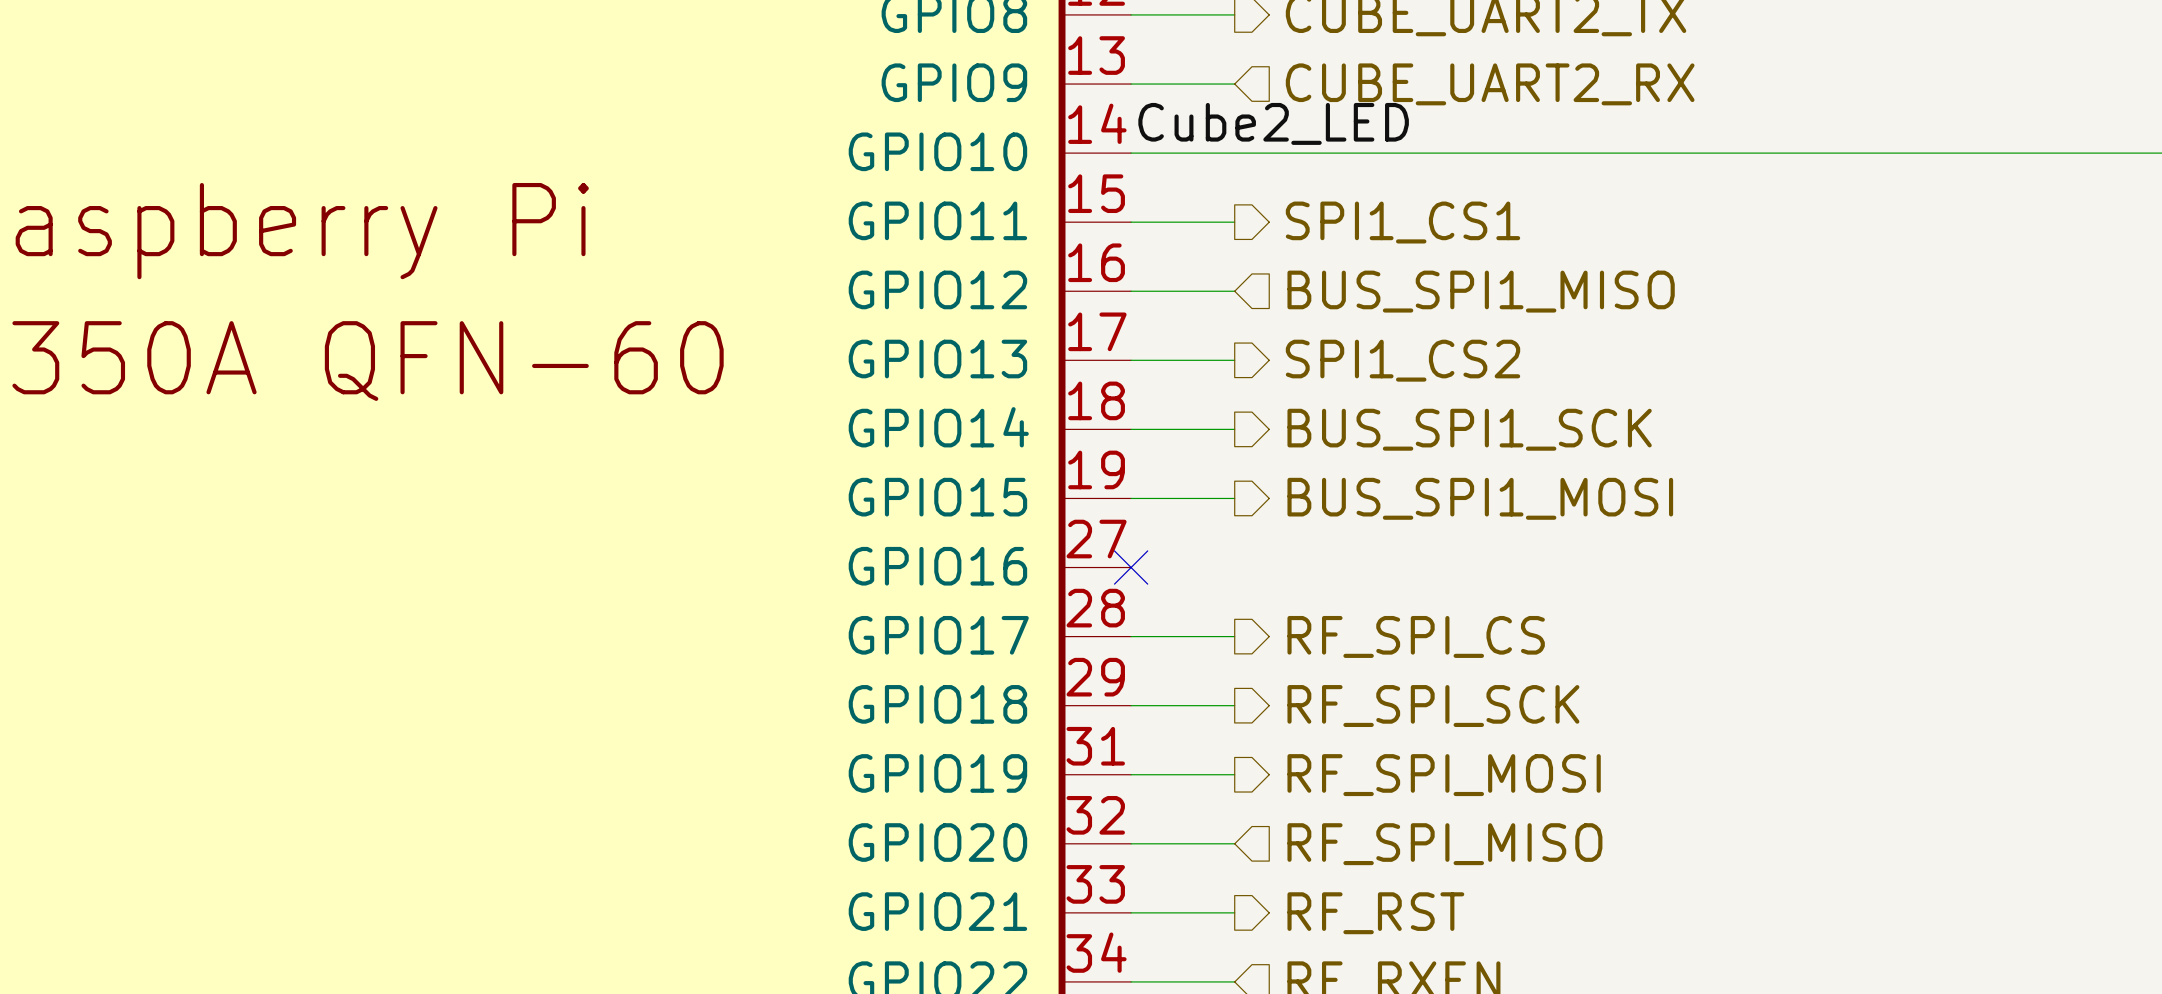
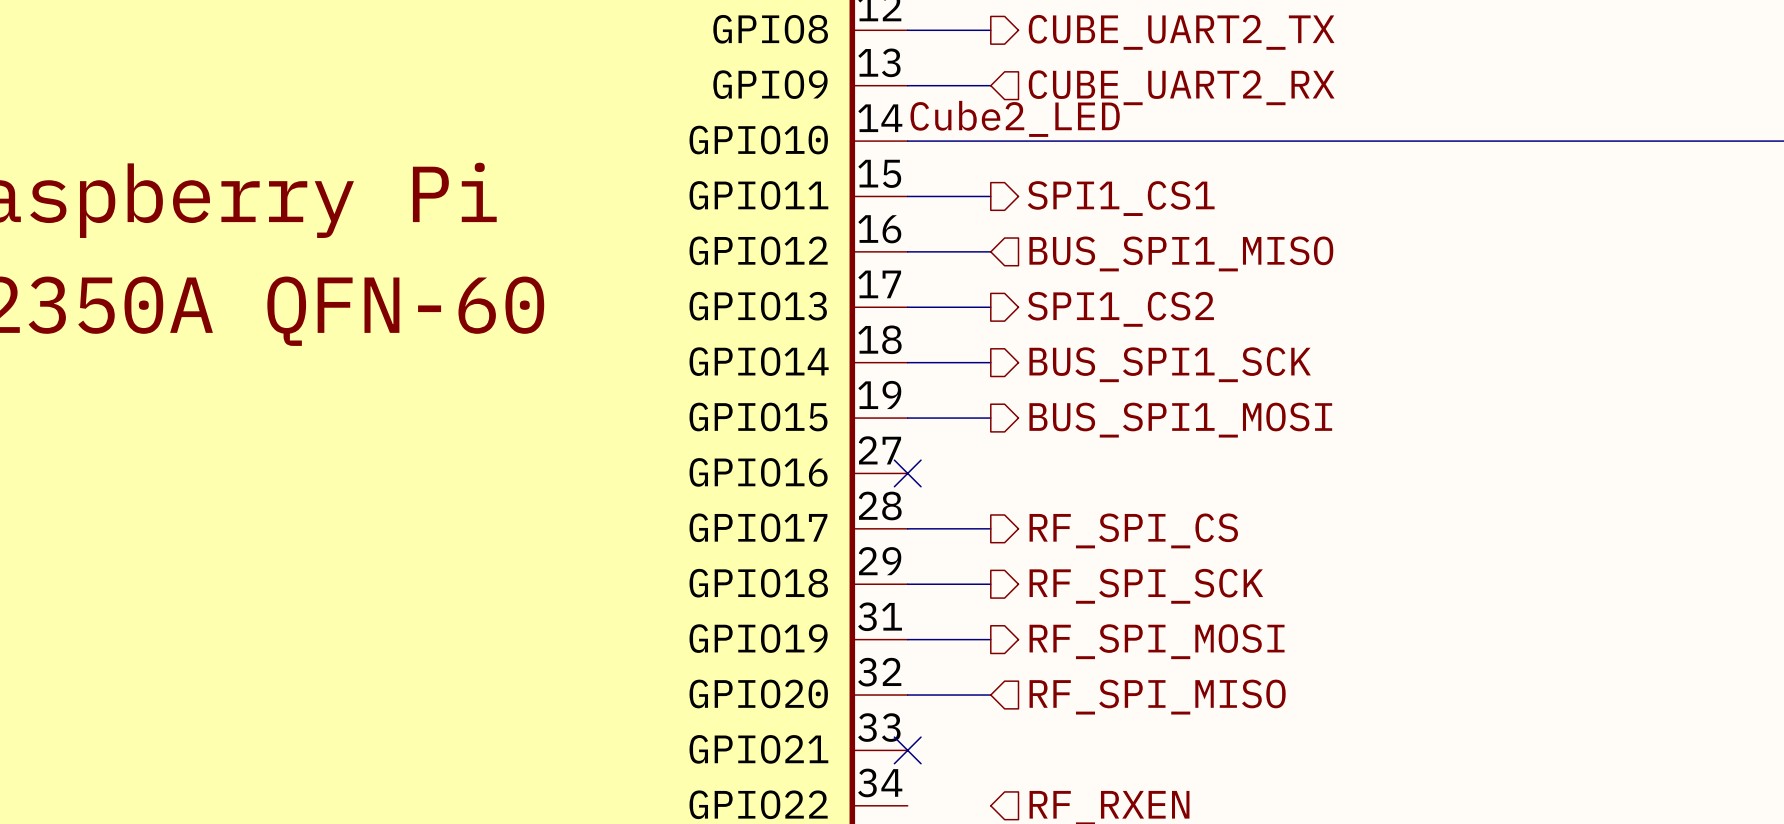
wire: (1131, 912) (1234, 912) -> none
no-connect mark: none -> (907, 750)
hierarchical label: RF_RST (1375, 913) -> none
wire: (1131, 981) (1234, 981) -> none

